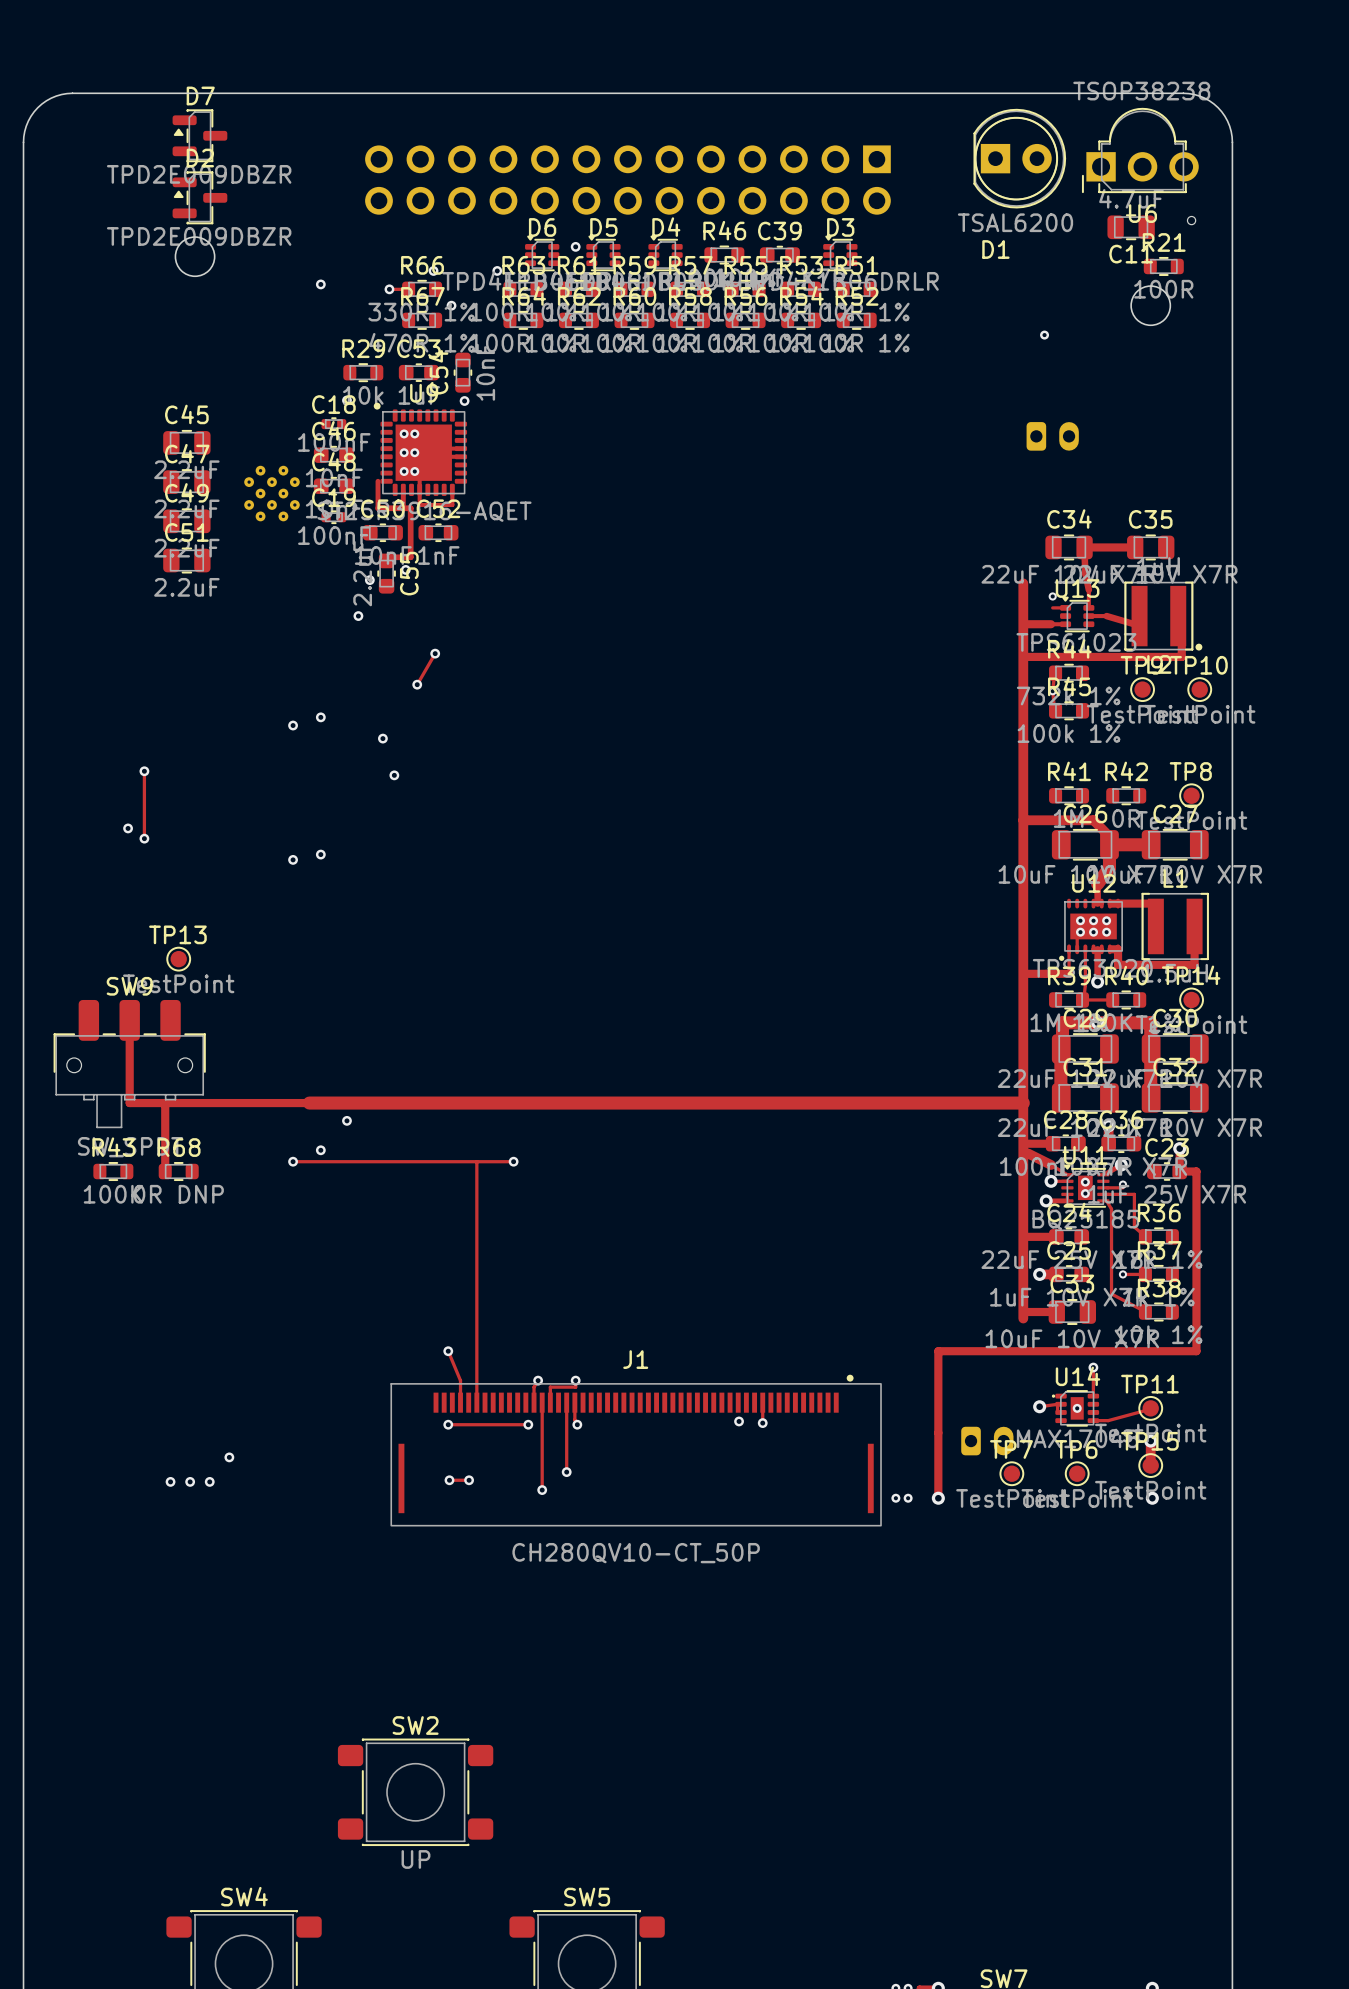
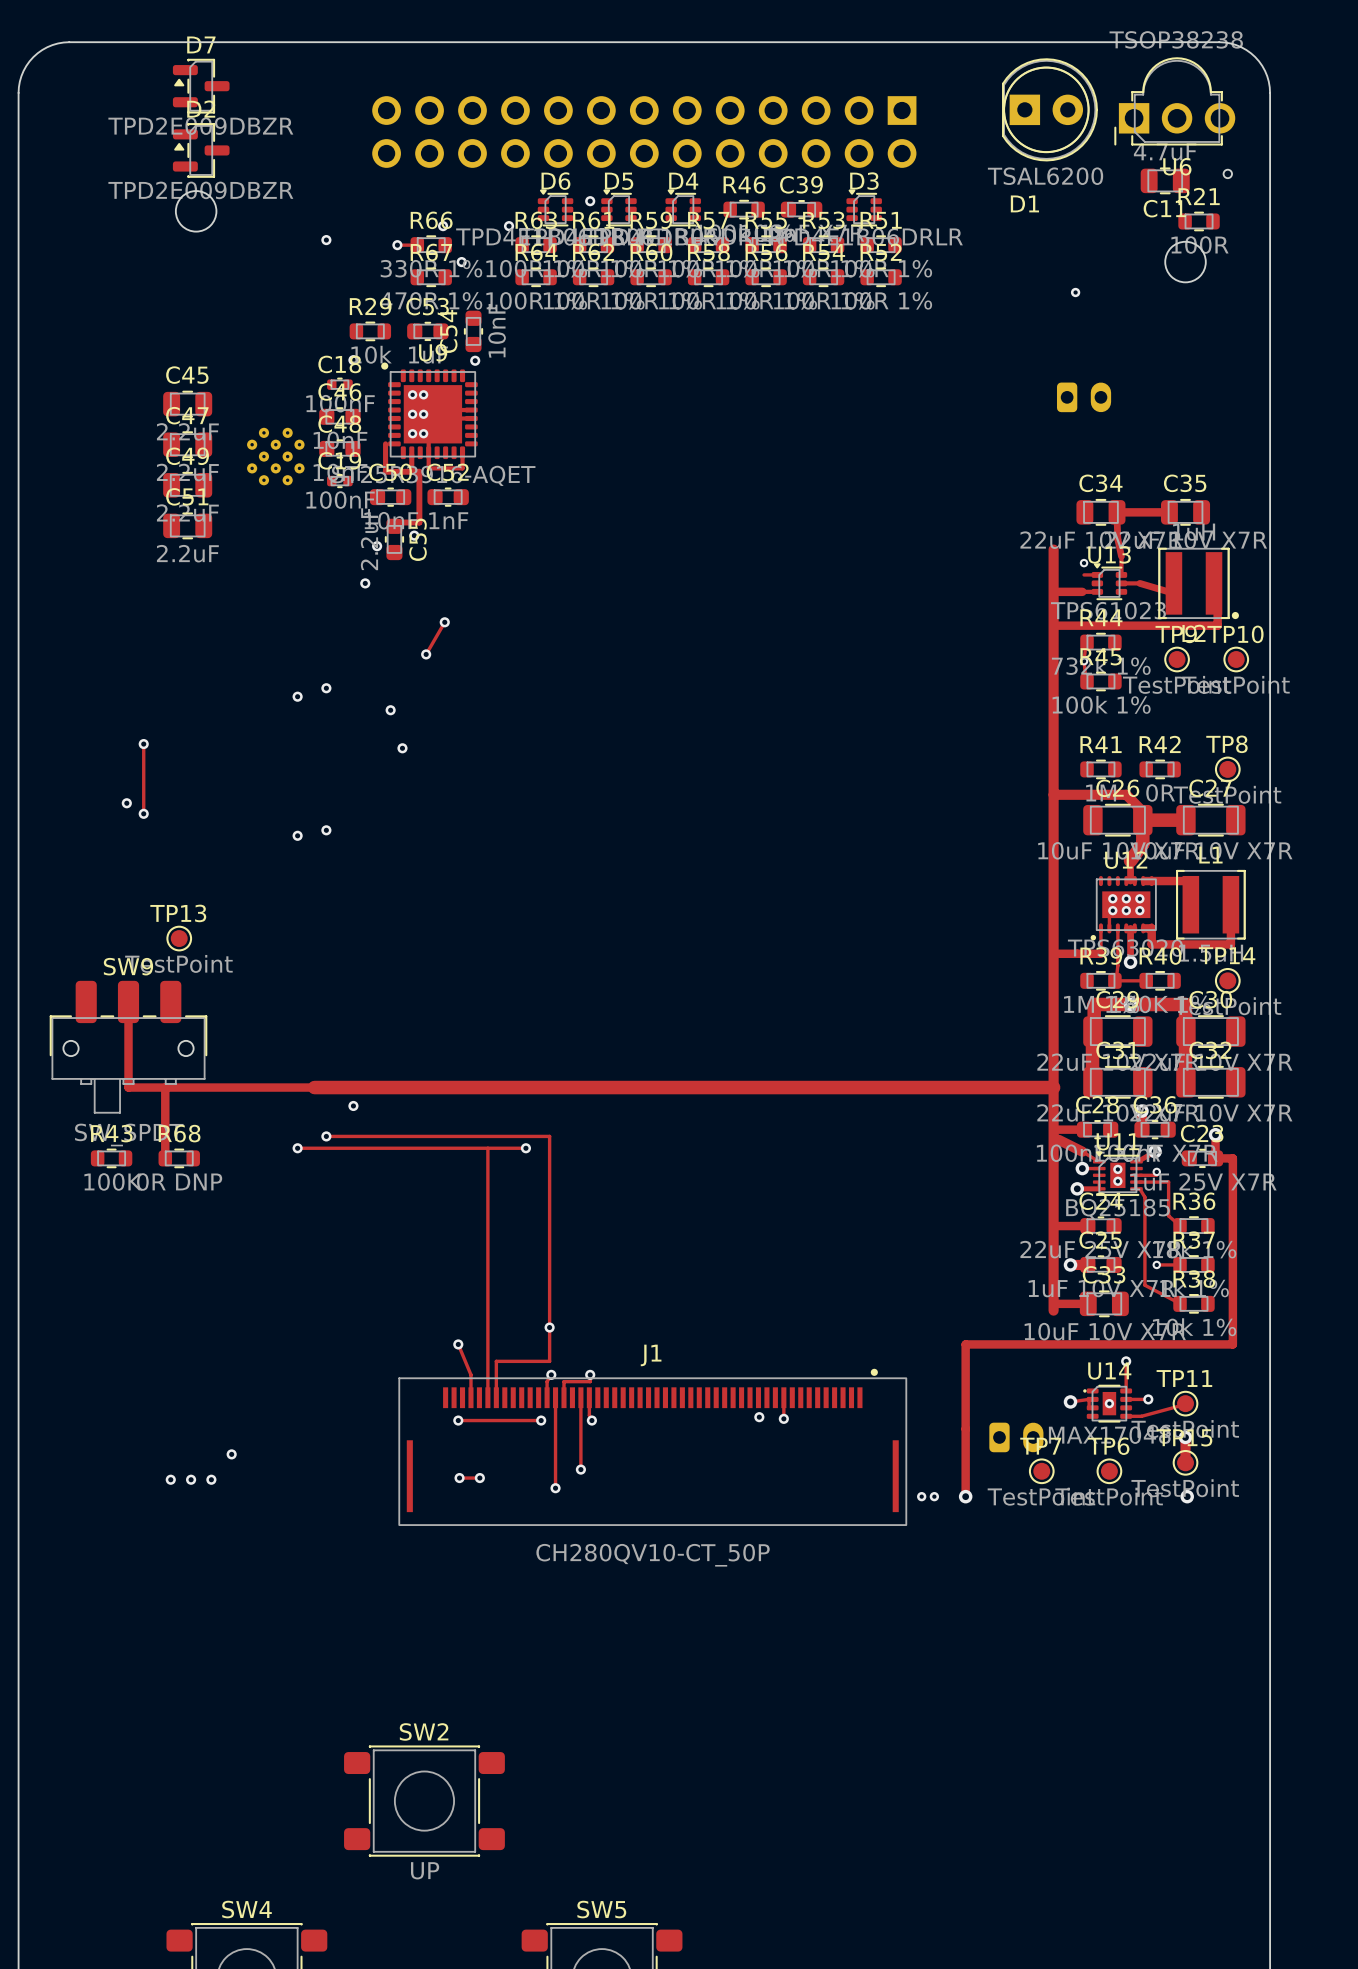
track: none -> (326, 1136) (549, 1136) (549, 1361) (496, 1361) (496, 1401)
via: none -> (549, 1327)
track: none -> (1126, 1399) (1148, 1399)
via: none -> (1148, 1399)

